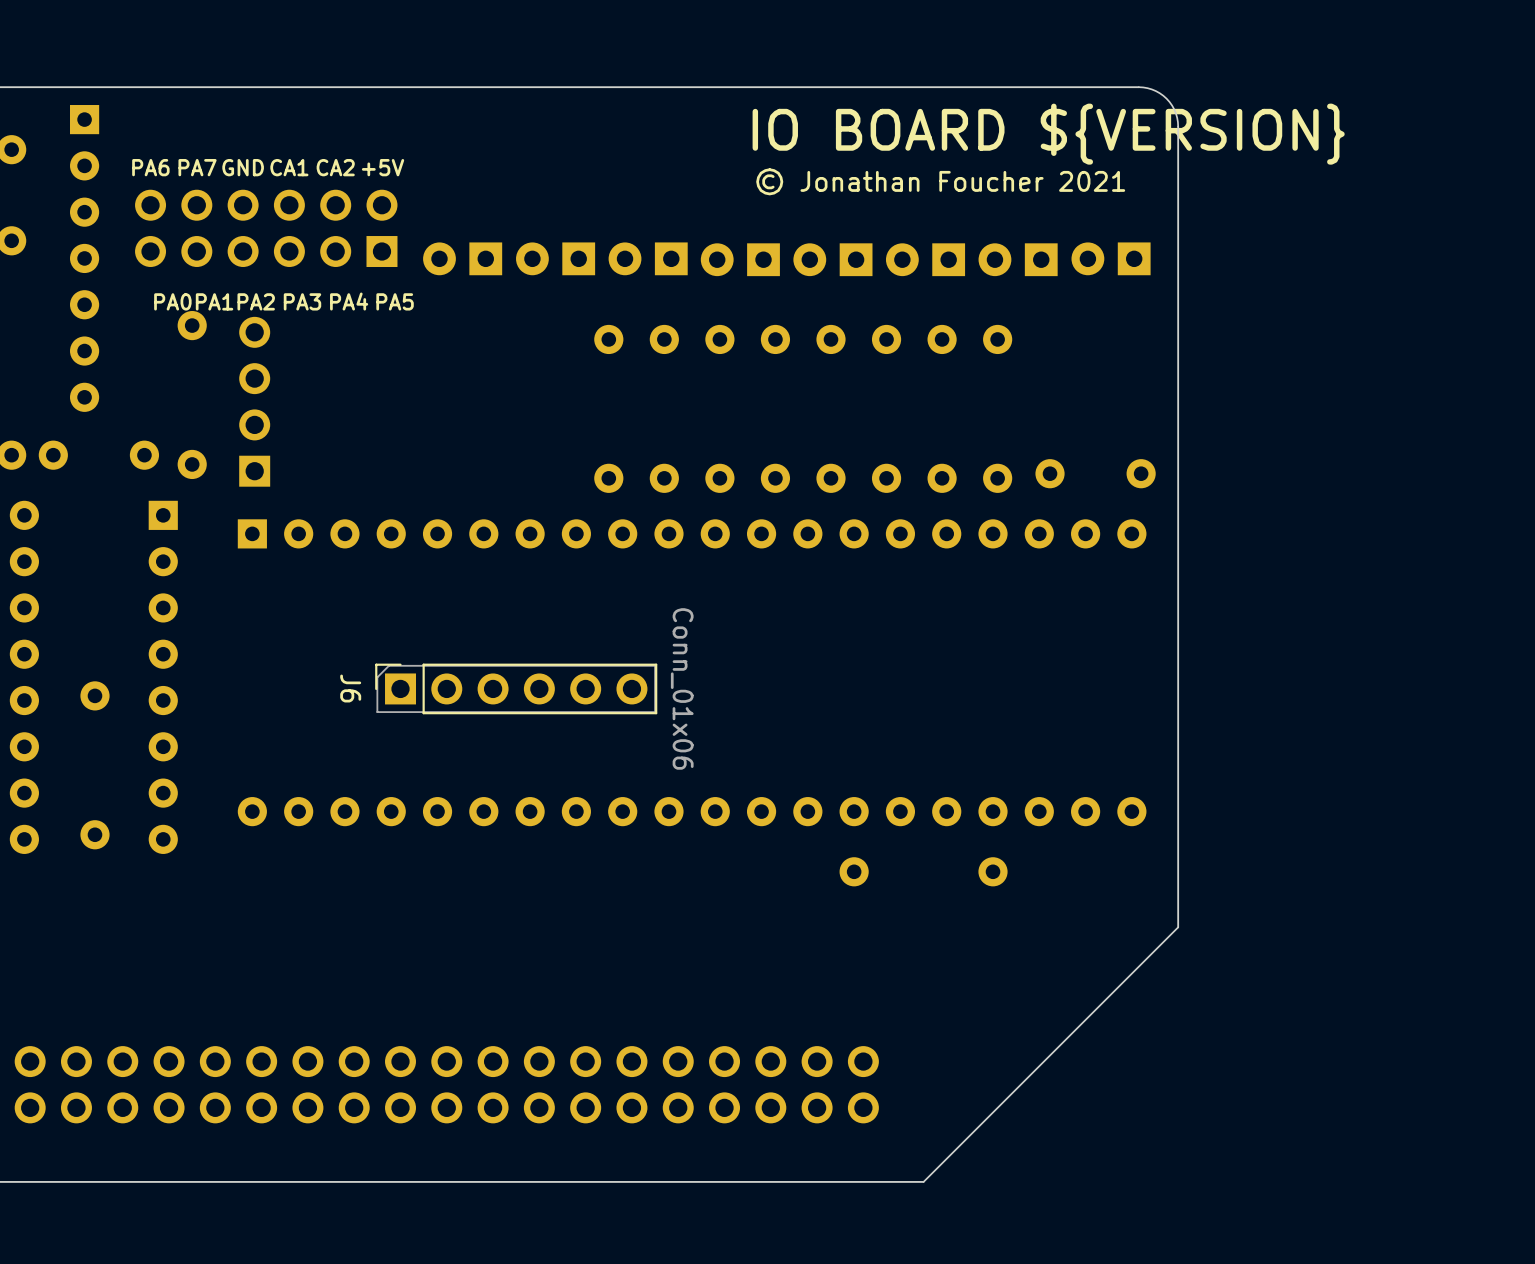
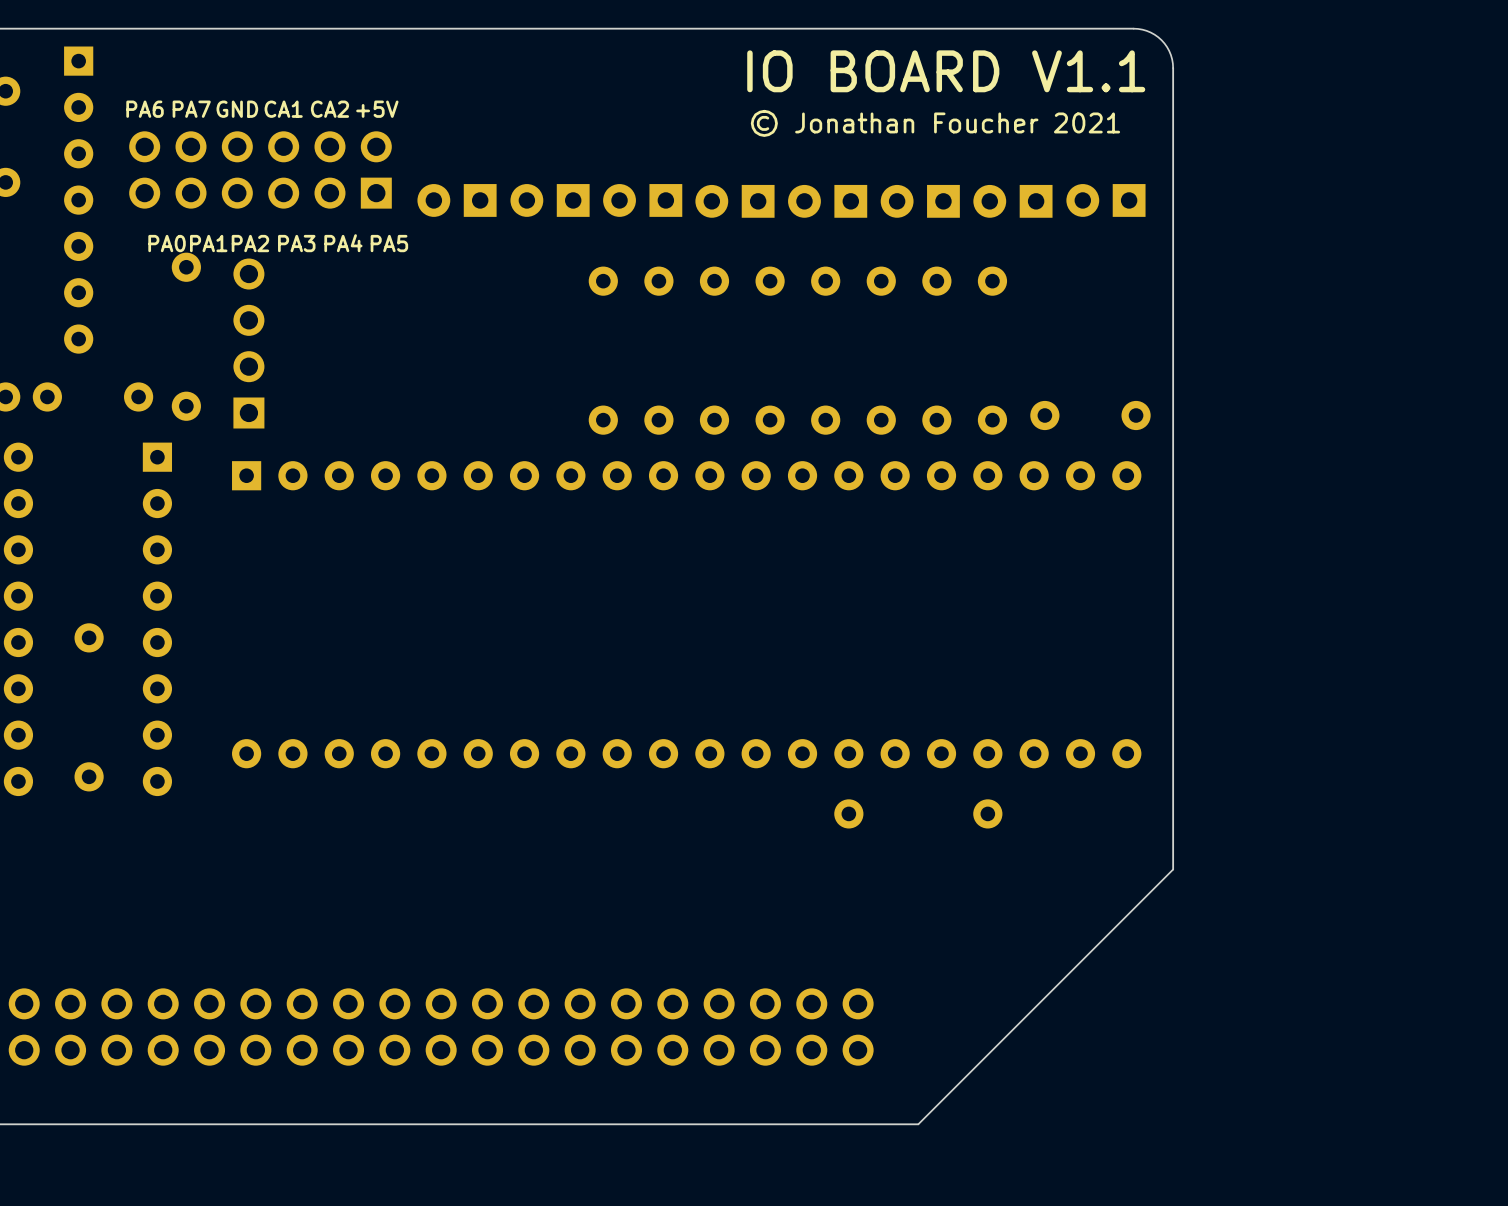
text: IO BOARD ${VERSION} (1048, 134) -> IO BOARD V1.1 (946, 71)
J6: Conn_01x06 (516, 688) -> none

